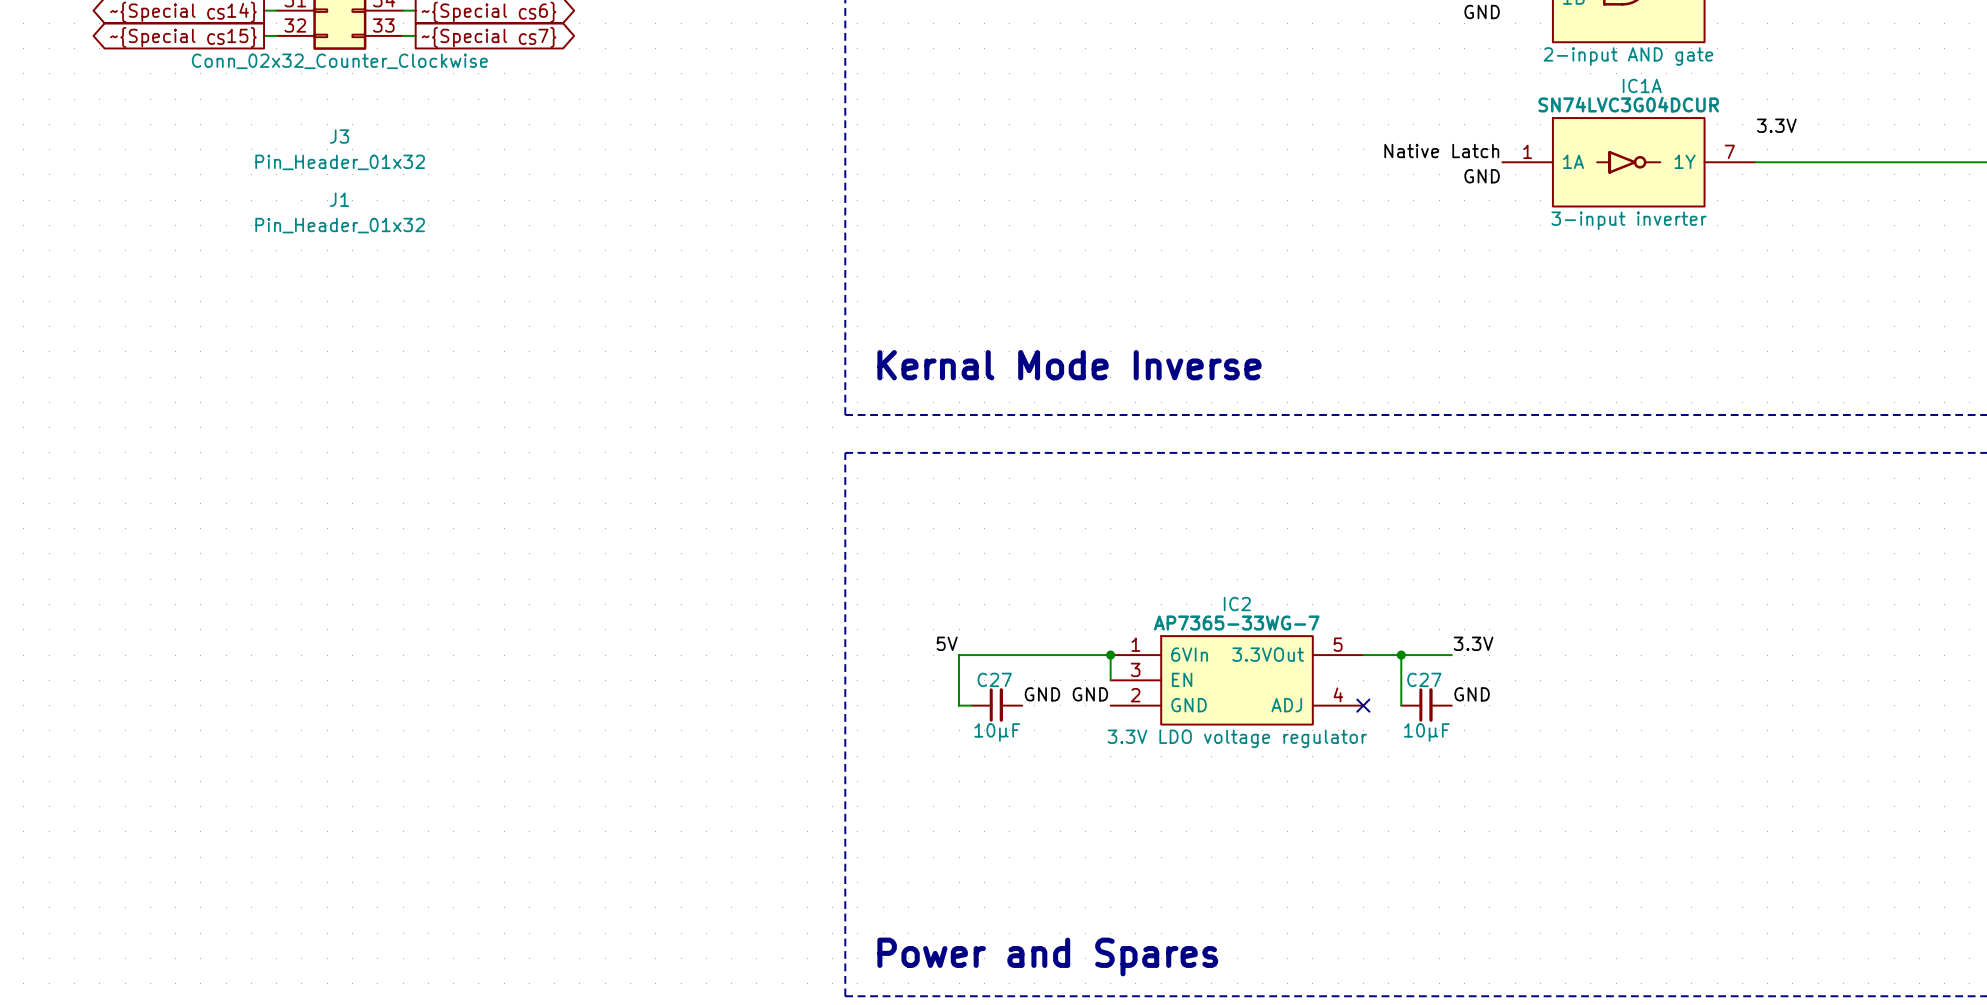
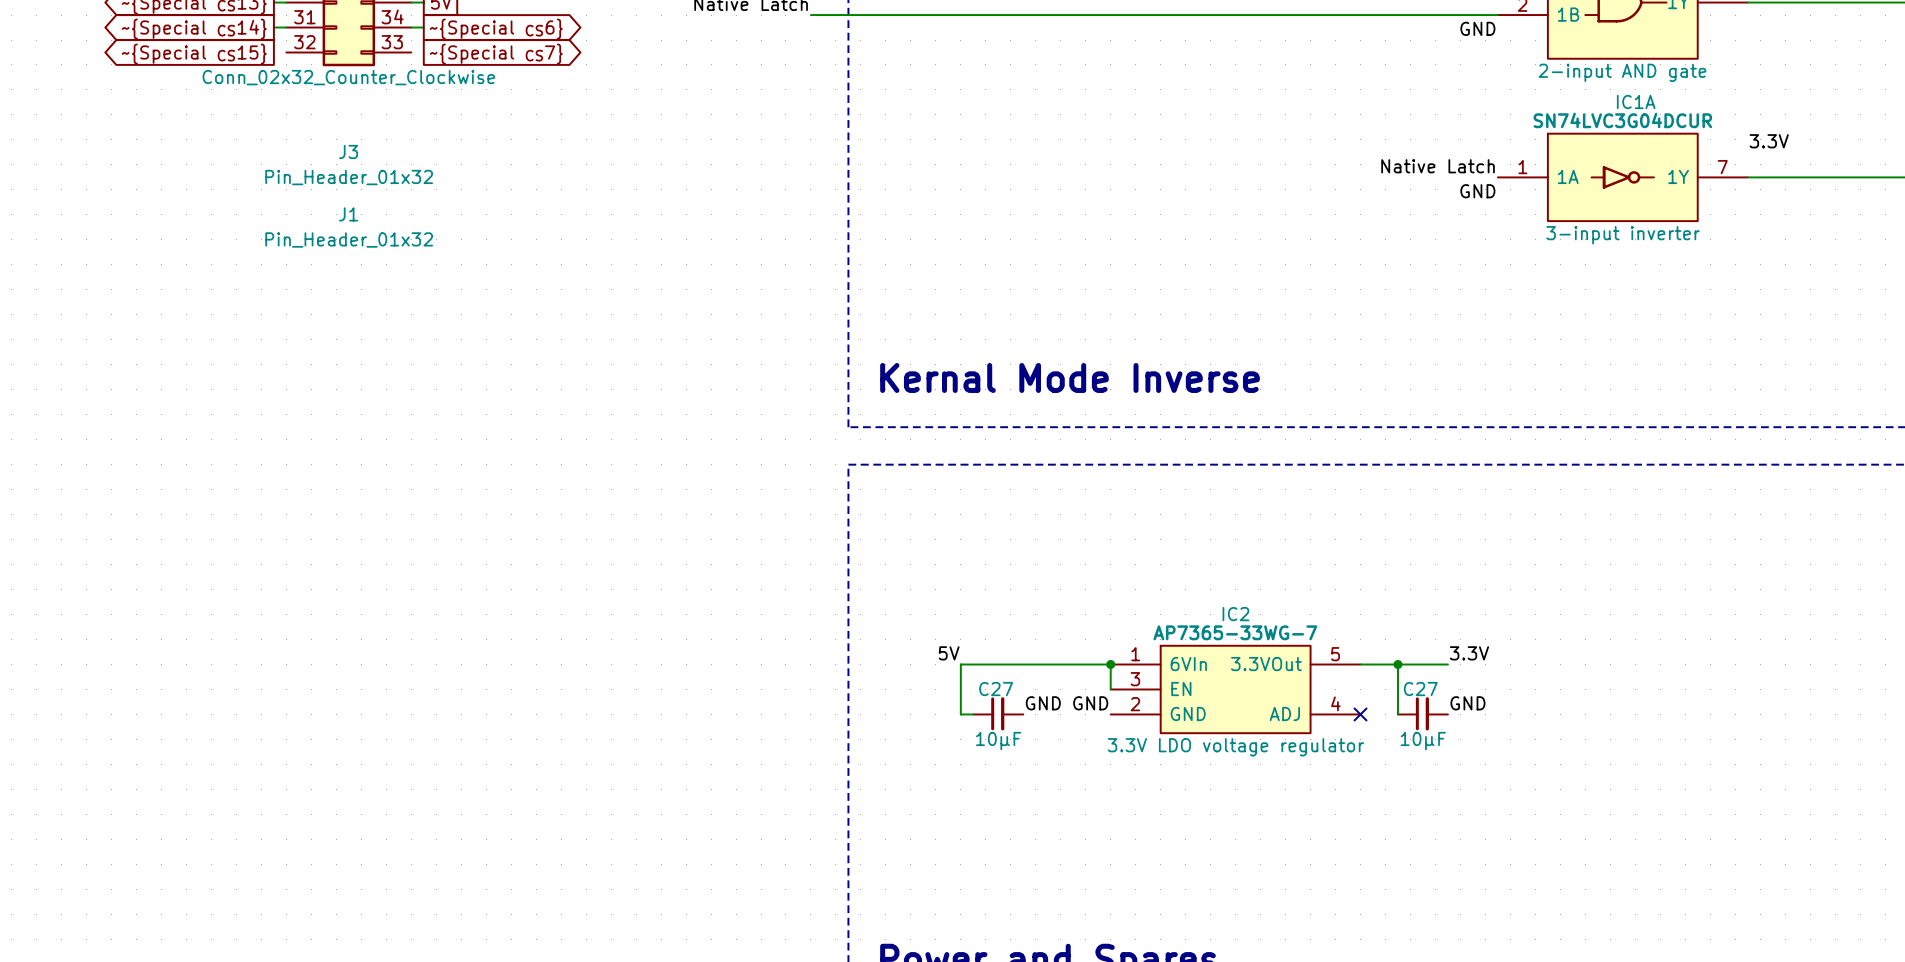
wire: (264, 35) (276, 35) -> none
wire: (403, 35) (415, 35) -> none

